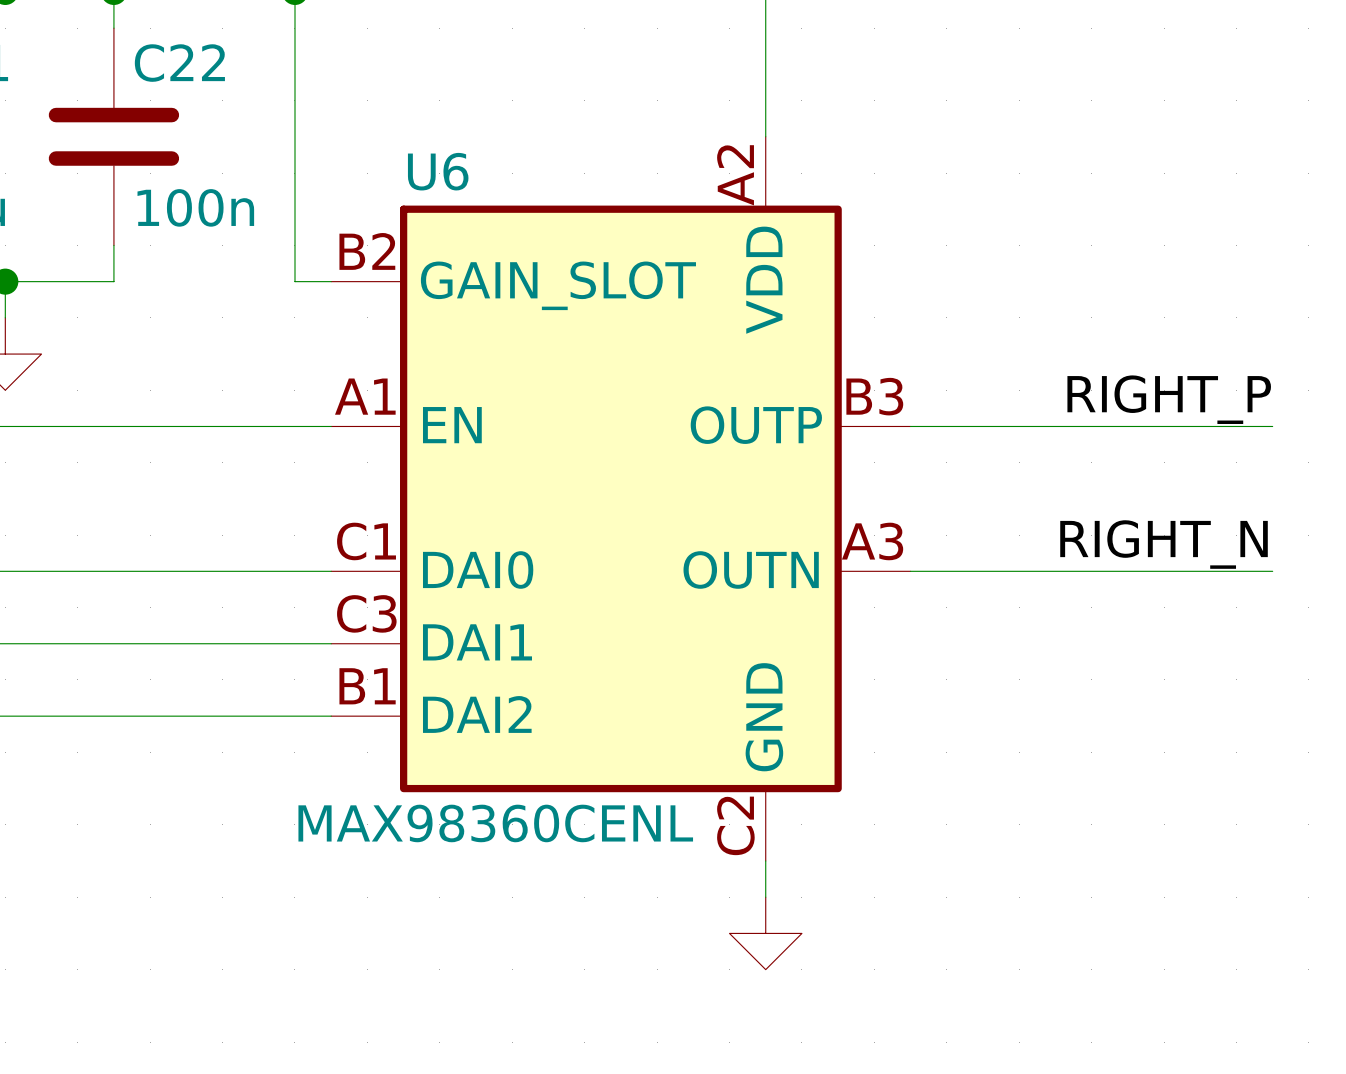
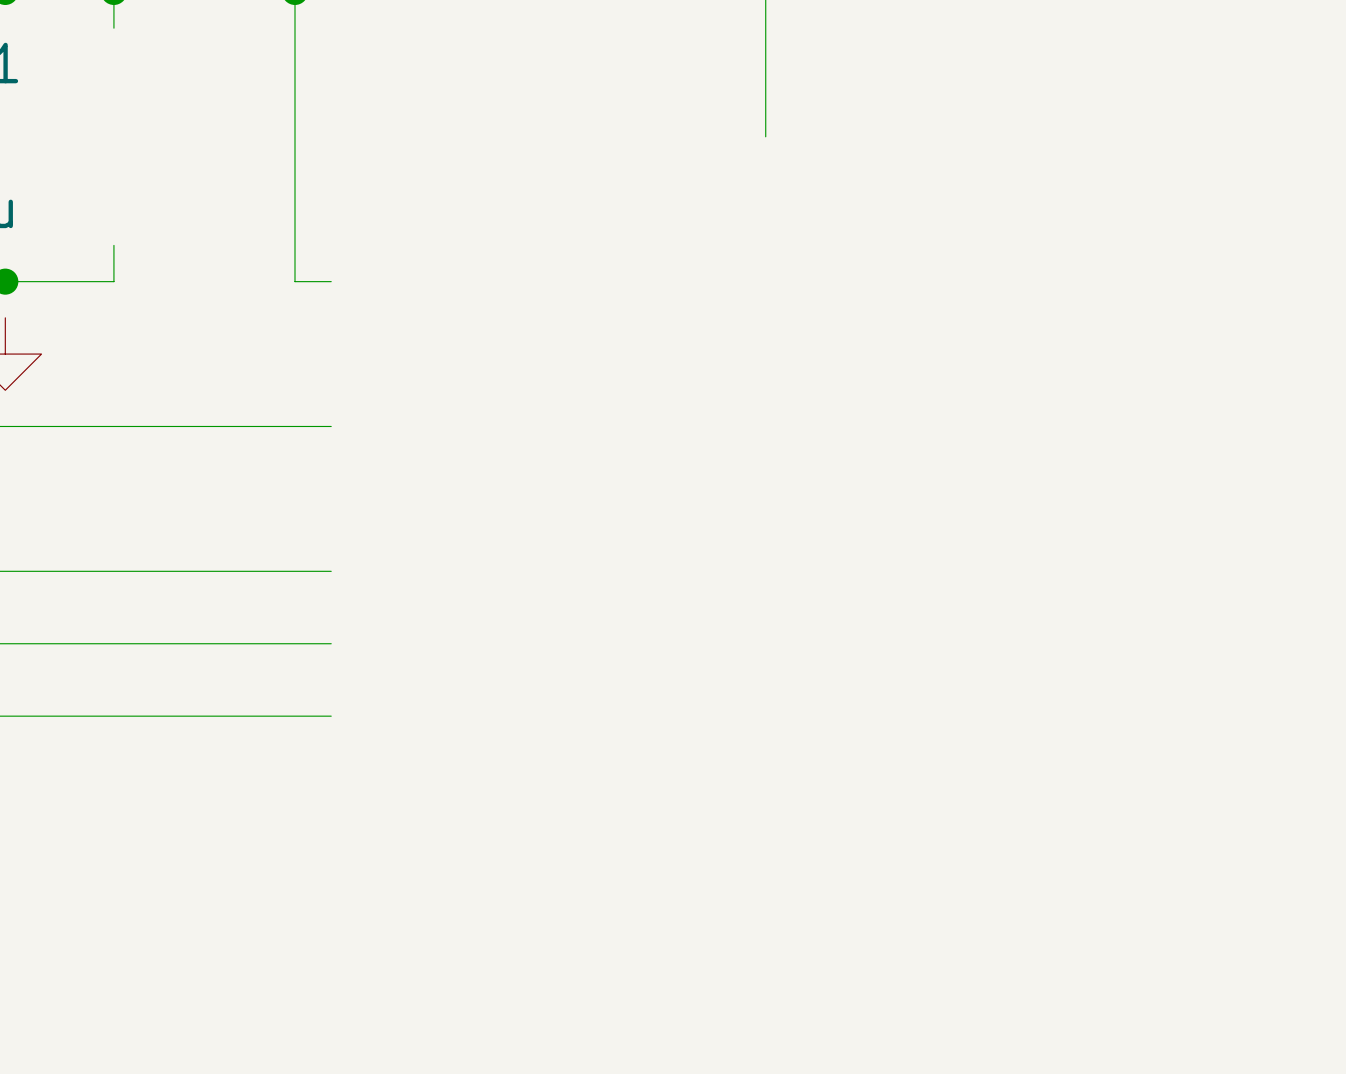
C22: 100n (113, 136) -> none
wire: (5, 281) (5, 317) -> none
label: RIGHT_P (1169, 399) -> none
wire: (910, 426) (1272, 426) -> none
U6: MAX98360CENL (620, 498) -> none
label: RIGHT_N (1164, 544) -> none
wire: (910, 571) (1272, 571) -> none
wire: (765, 861) (765, 897) -> none
power symbol: (765, 933) -> none

